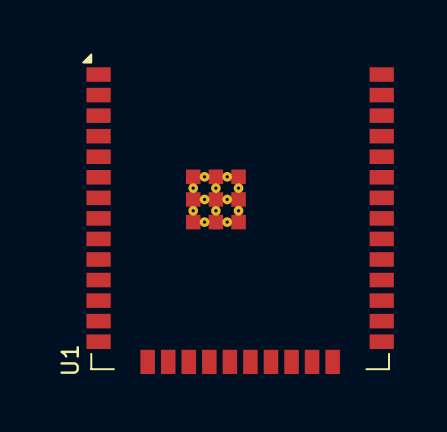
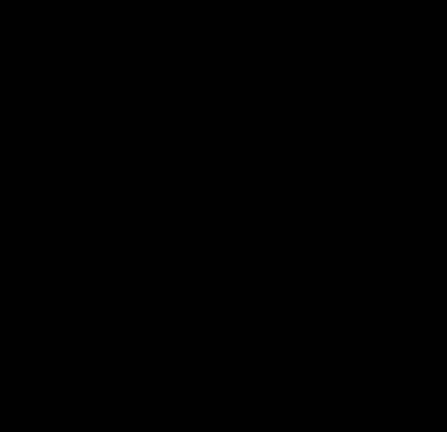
U1: (238, 213) -> none

